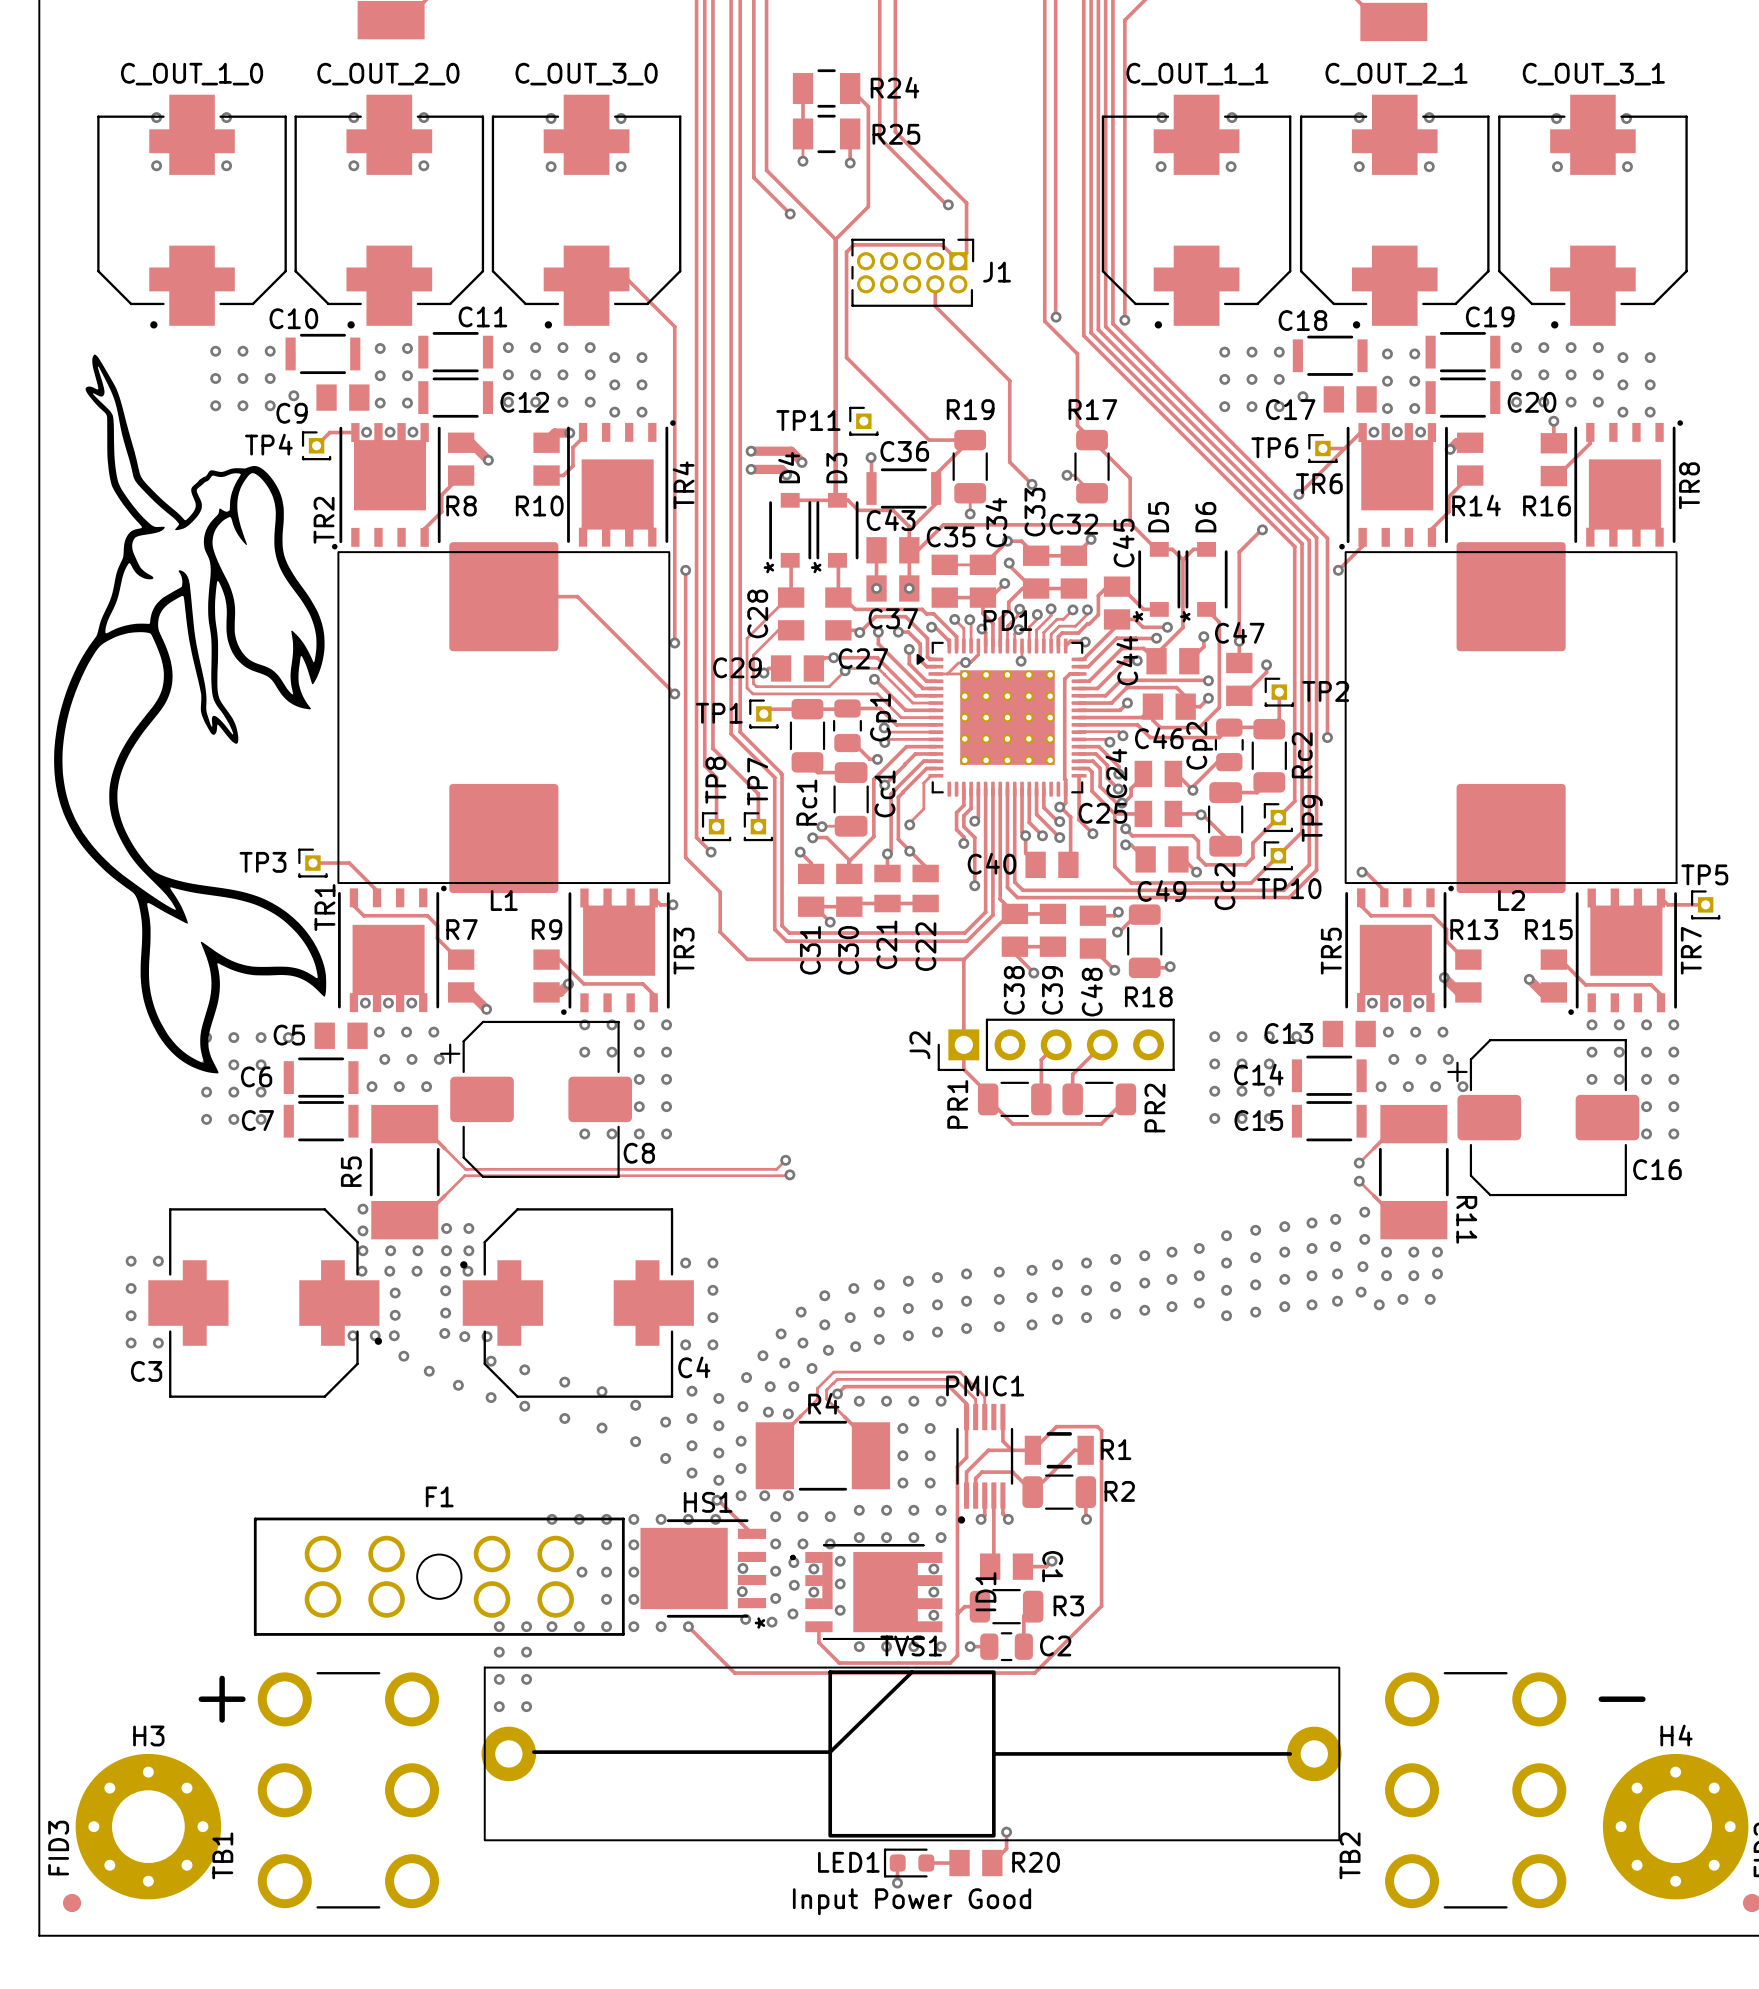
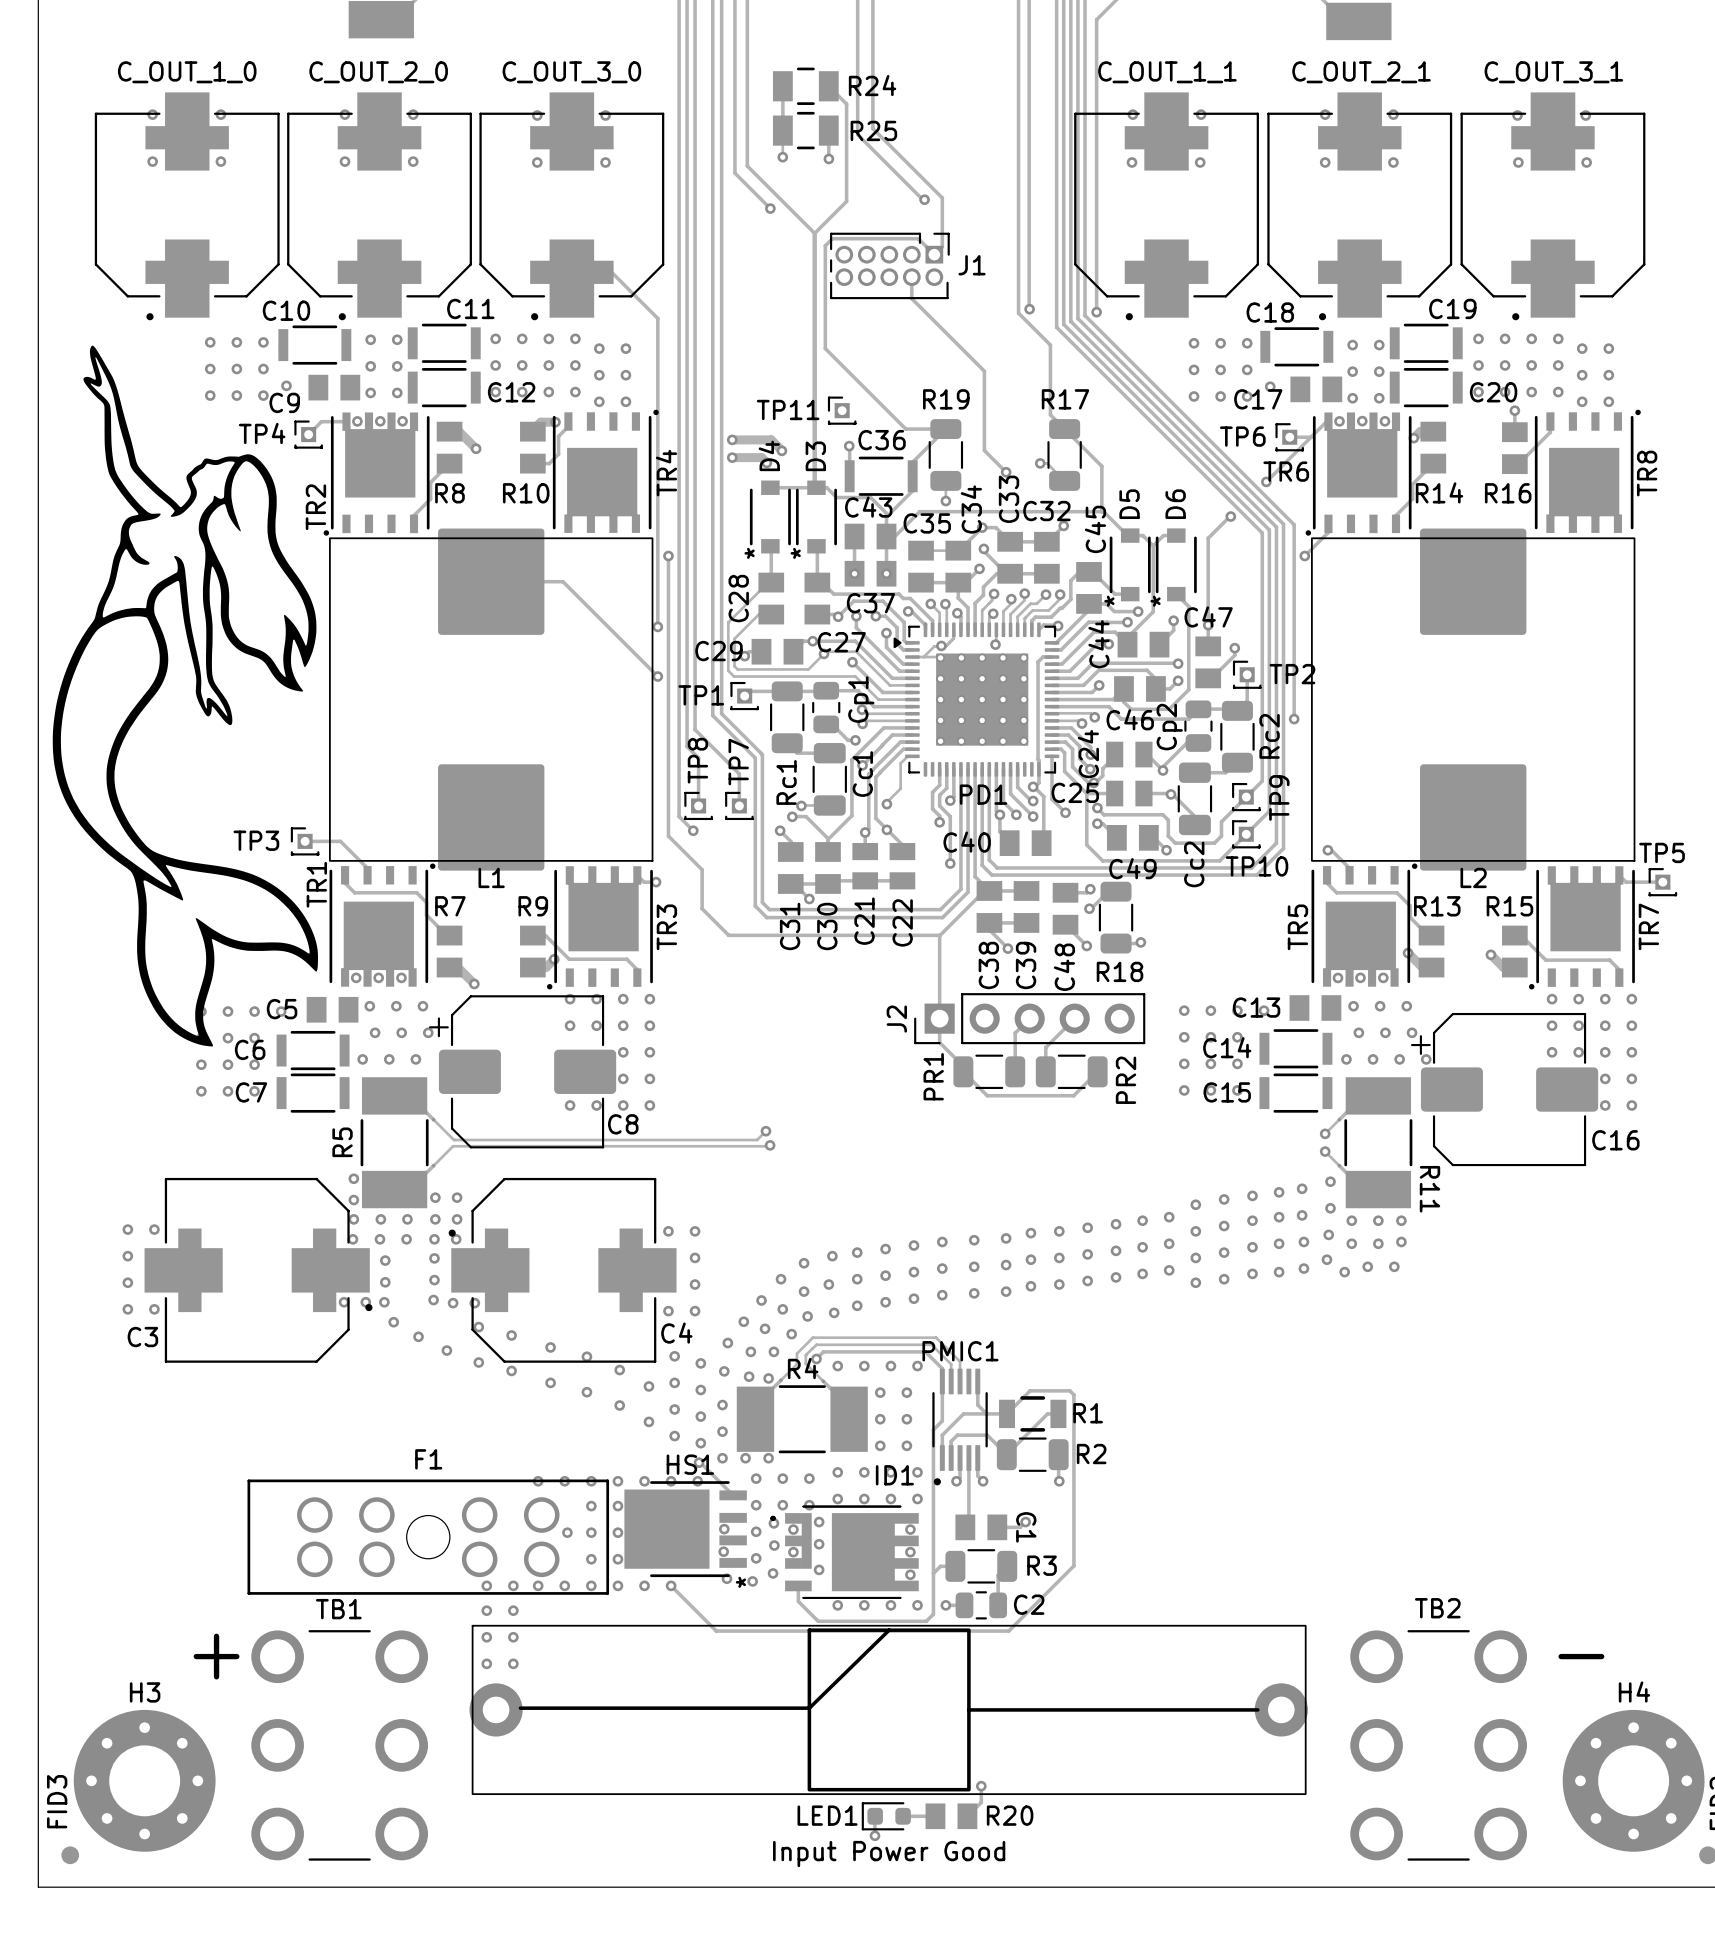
PD1 name position: PD1 (1007, 620) -> PD1 (983, 794)
ID1 name rotation: 0° (985, 1591) -> 90° clockwise (894, 1475)
ID1 name position: ID1 (985, 1591) -> ID1 (894, 1475)
TVS1 name: TVS1 (911, 1645) -> none
TB1 name rotation: 0° (222, 1855) -> 90° clockwise (338, 1609)
TB1 name position: TB1 (222, 1855) -> TB1 (338, 1609)
TB2 name rotation: 0° (1350, 1855) -> 90° clockwise (1437, 1608)
TB2 name position: TB2 (1350, 1855) -> TB2 (1437, 1608)

